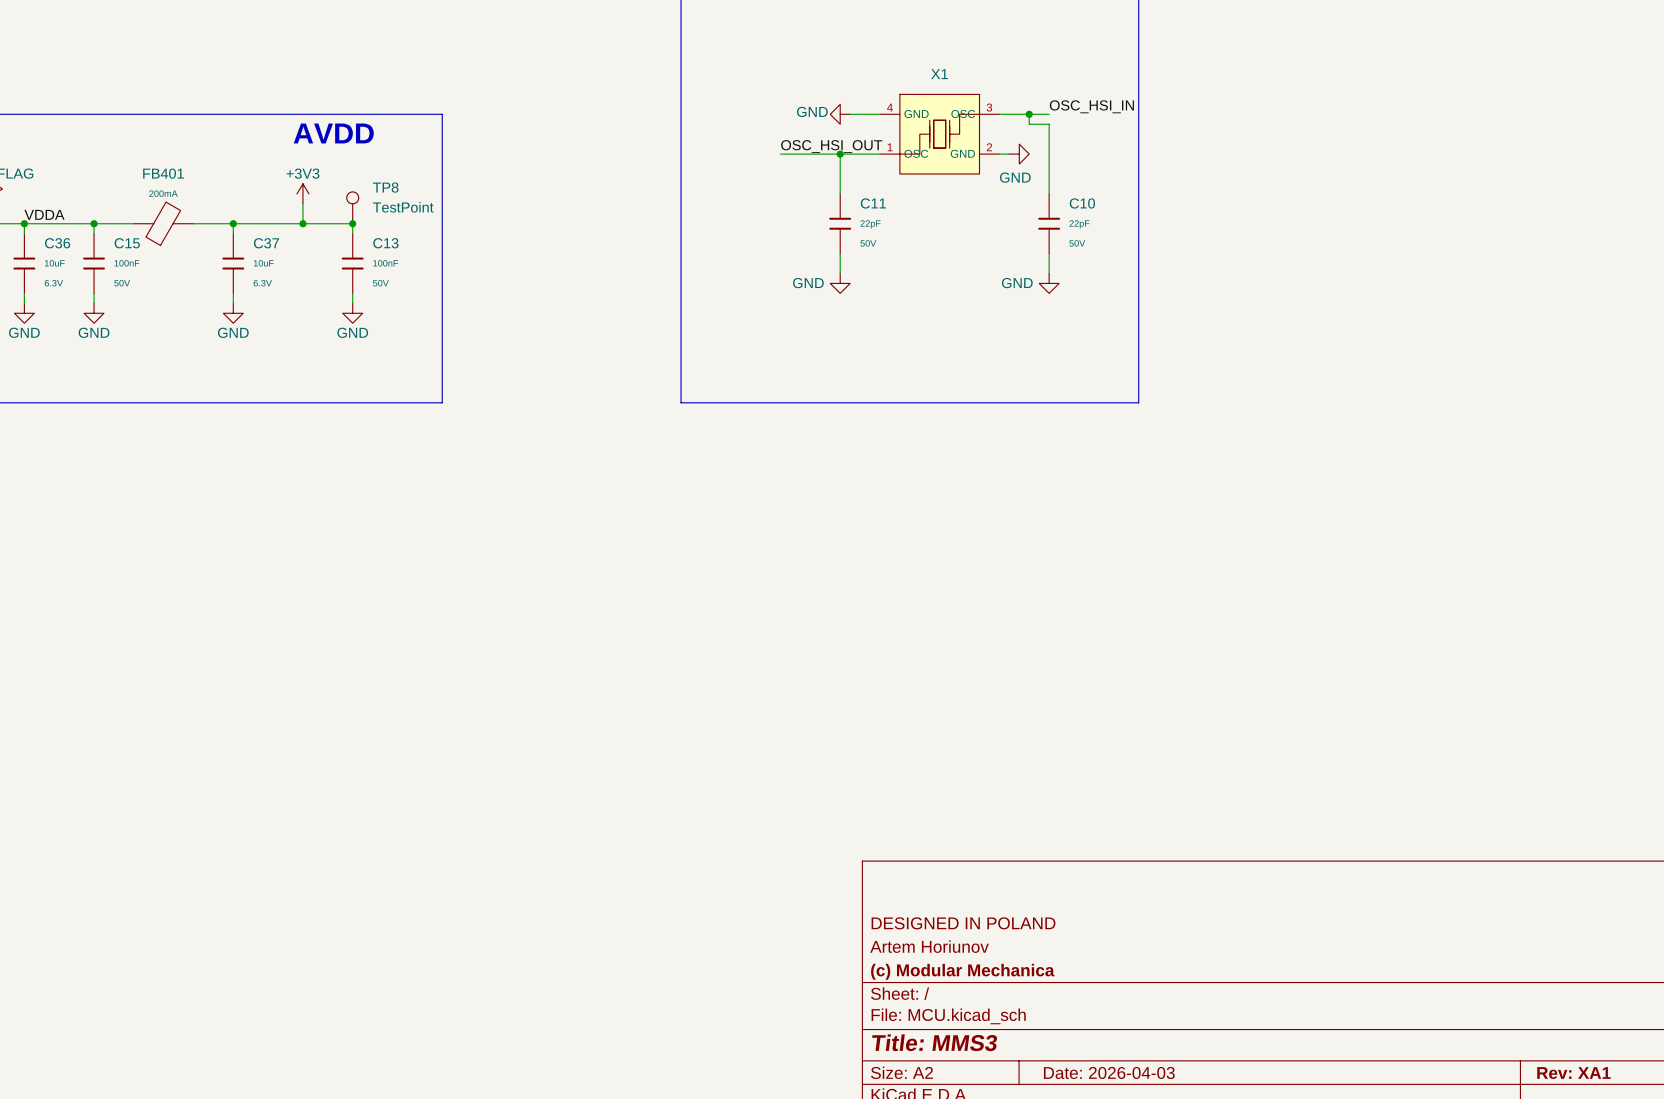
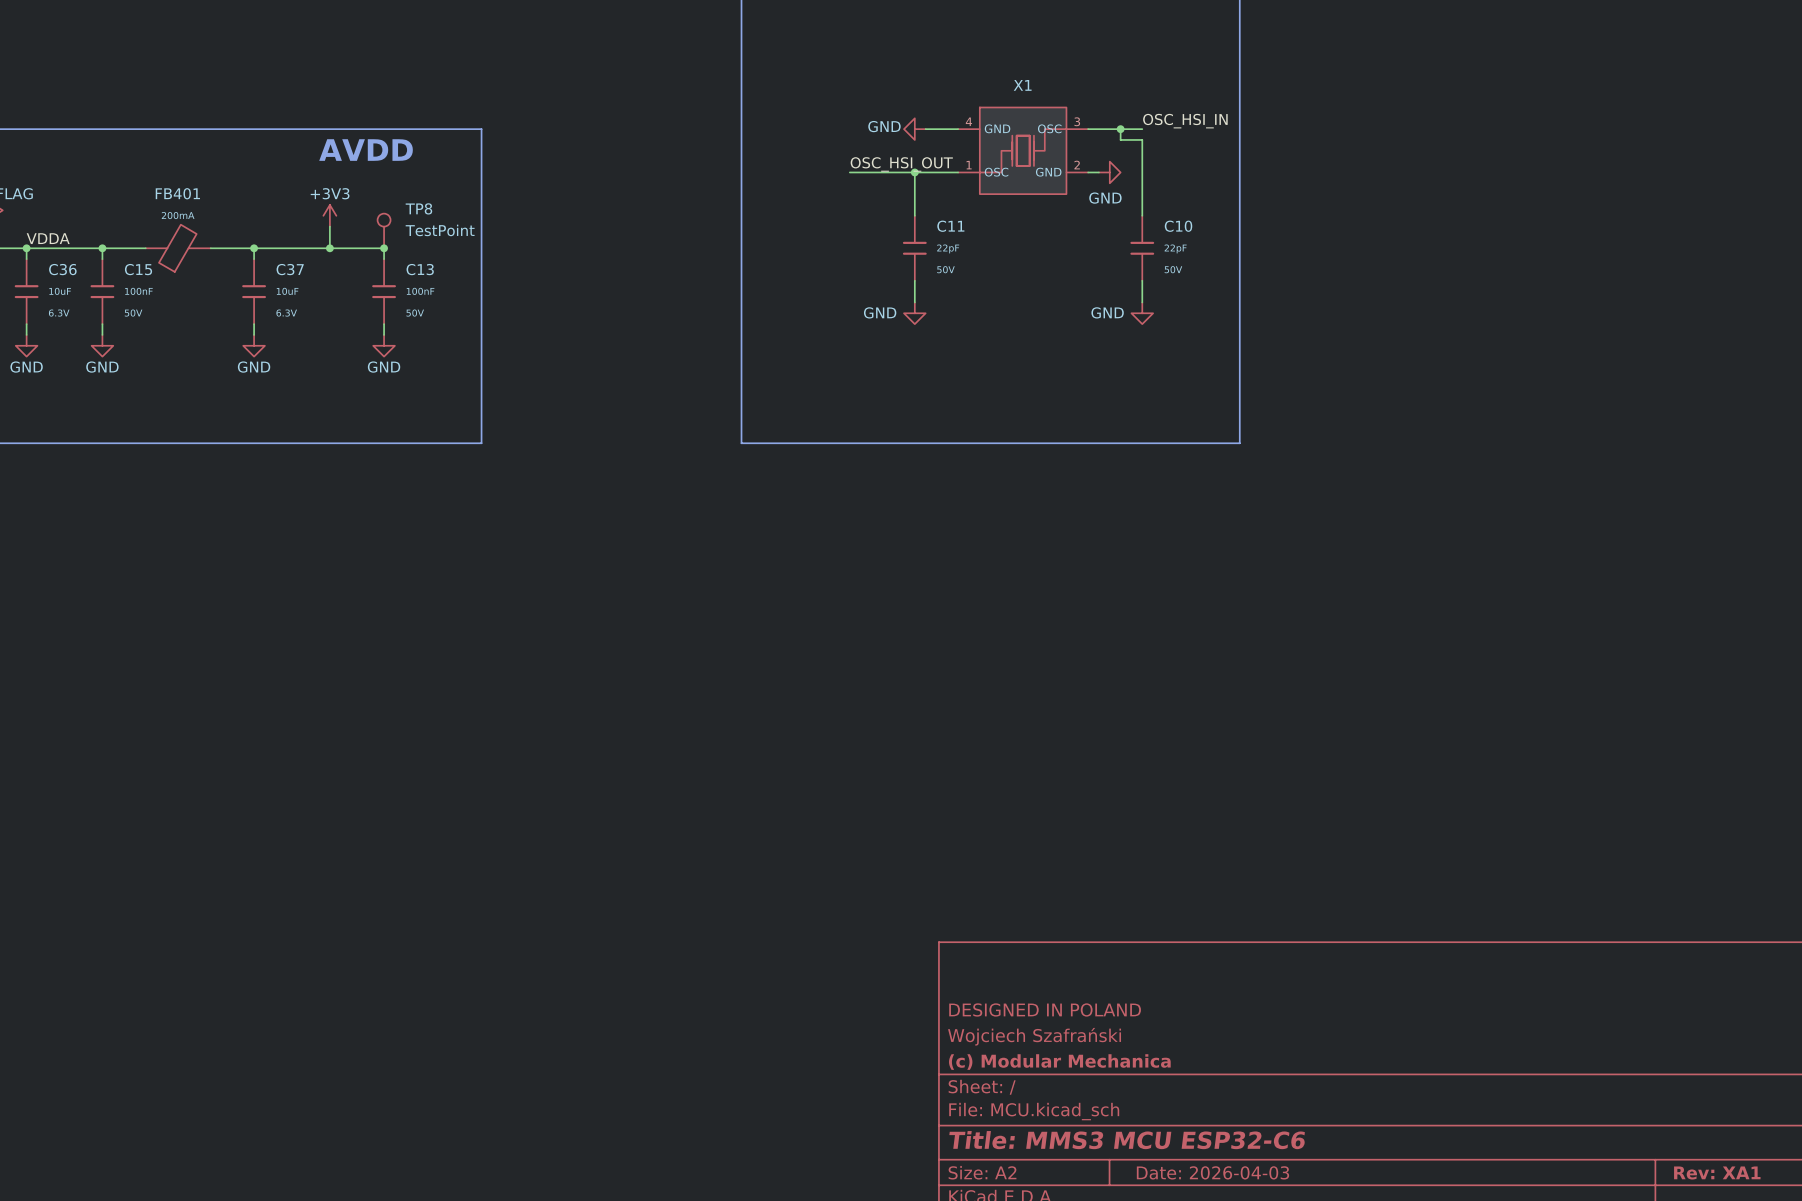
title block: Artem Horiunov (929, 946) -> Wojciech Szafrański (1034, 1036)
title block: Title: MMS3 (934, 1042) -> Title: MMS3 MCU ESP32-C6 (1127, 1140)

